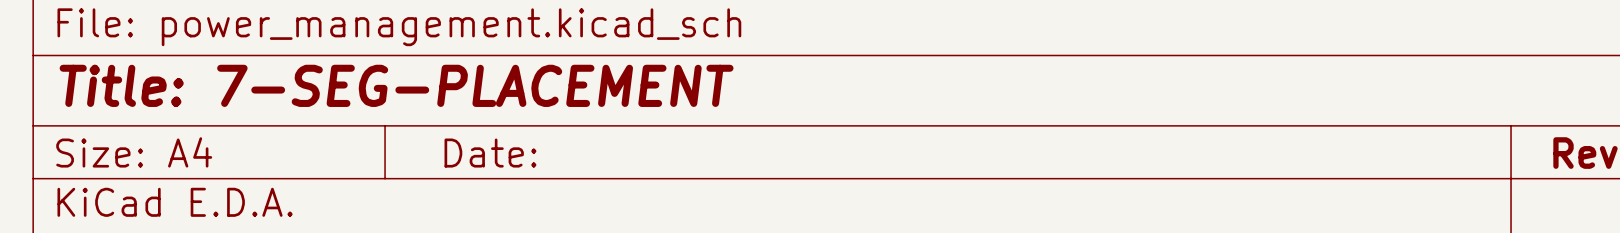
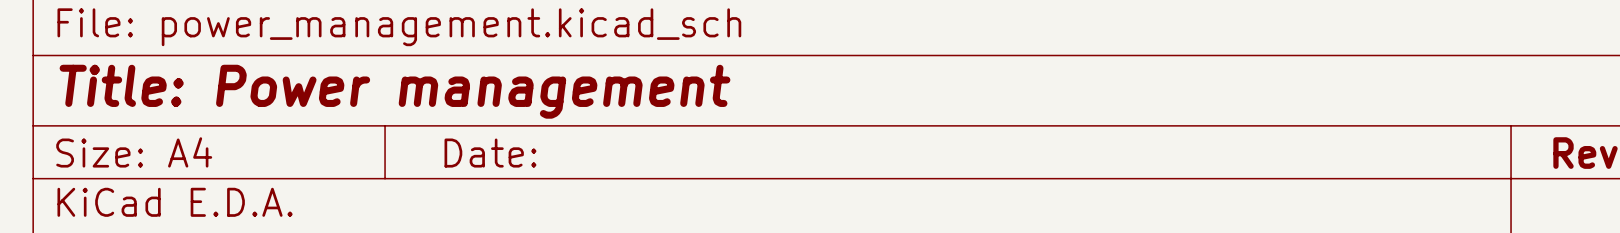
title block: Title: 7-SEG-PLACEMENT (396, 85) -> Title: Power management (395, 91)

